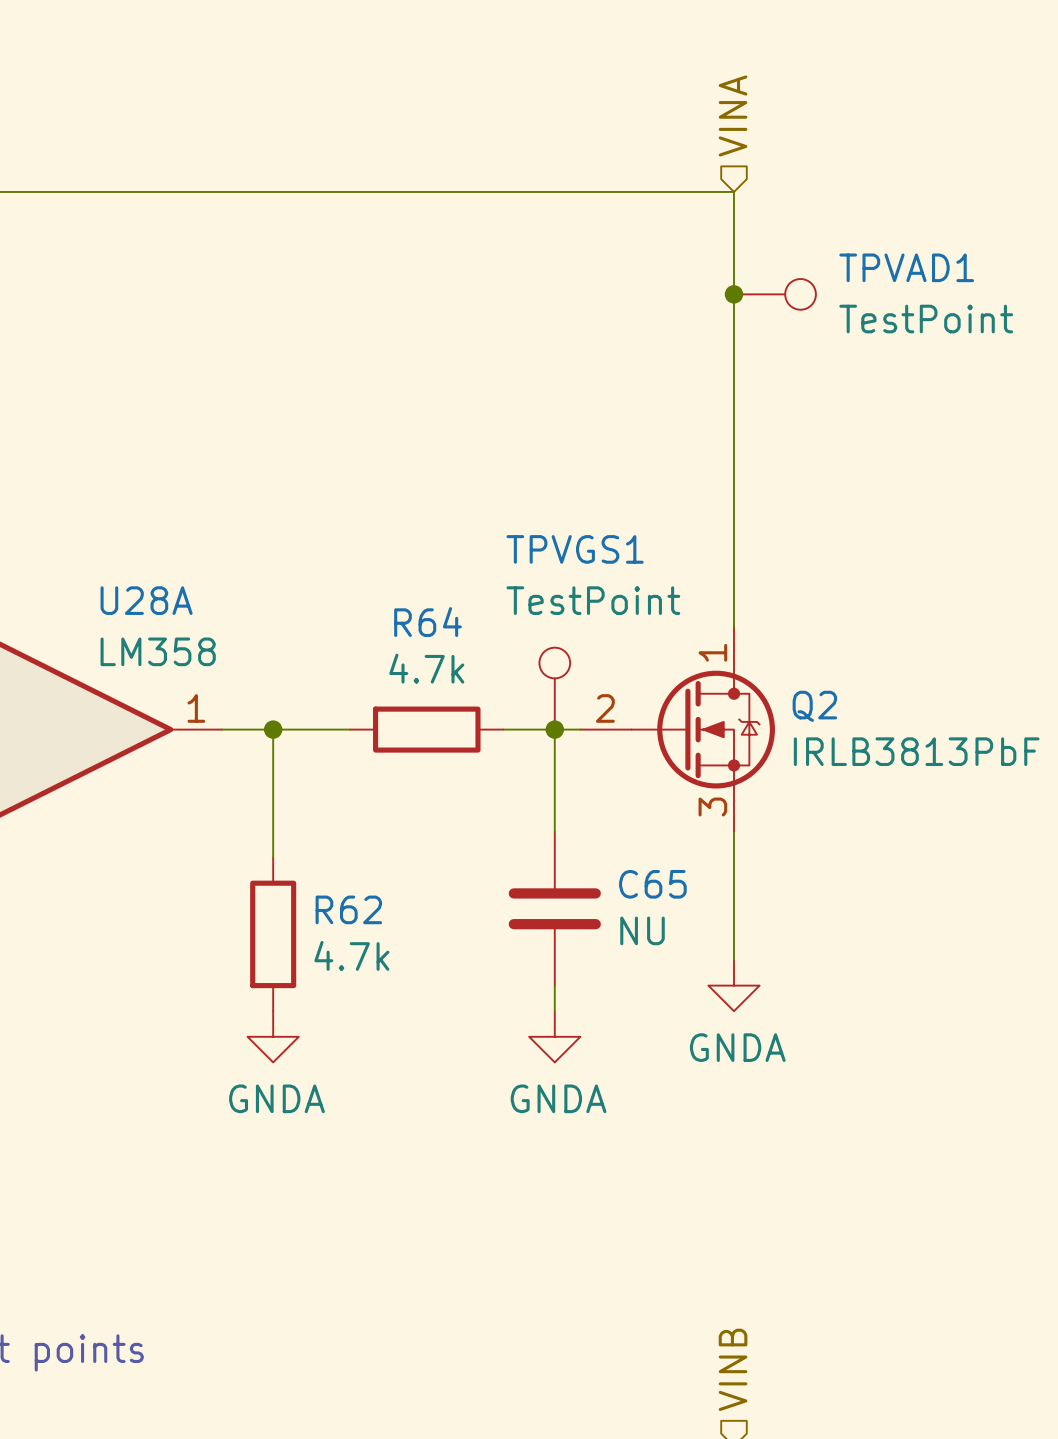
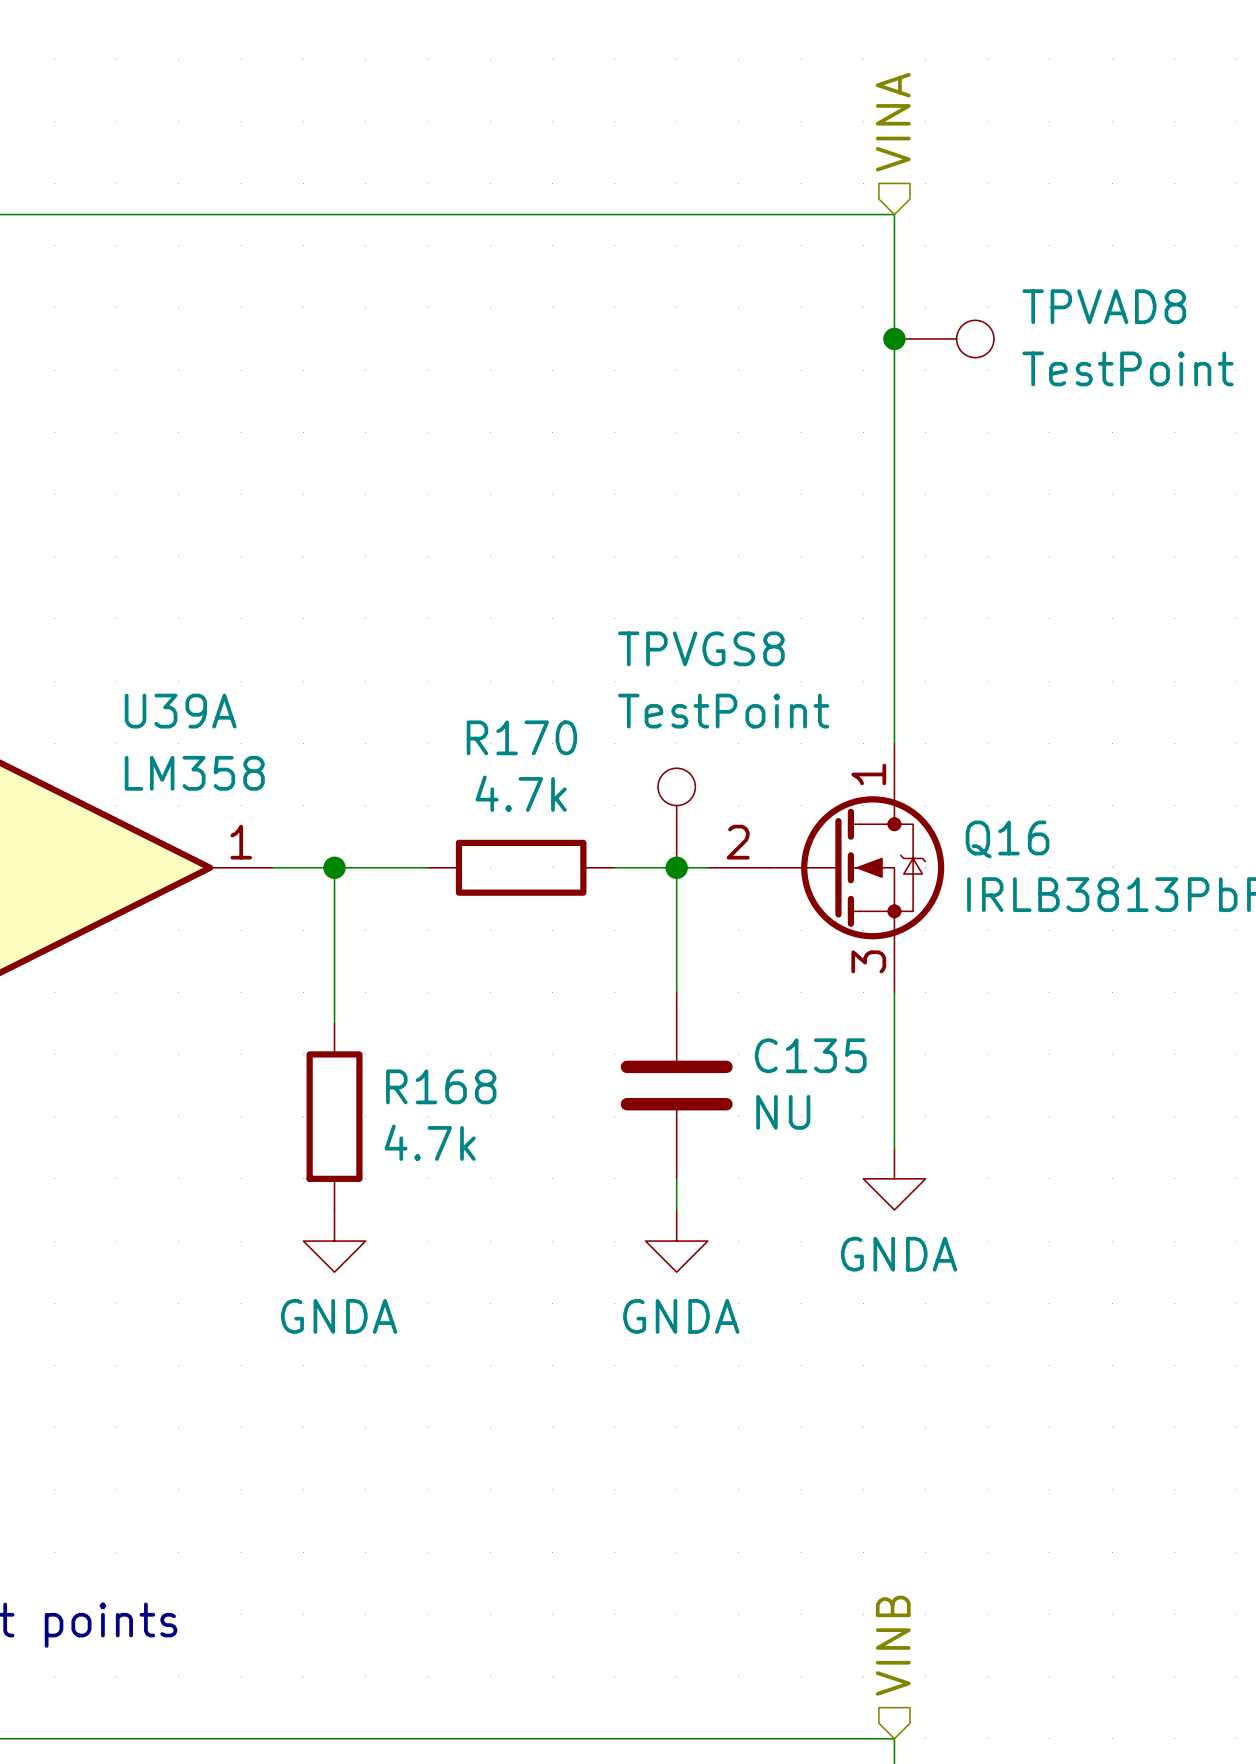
TPVAD1 name: TPVAD1 (906, 267) -> TPVAD8 (1104, 306)
TPVGS1 name: TPVGS1 (575, 549) -> TPVGS8 (701, 648)
U28A name: U28A (146, 600) -> U39A (180, 711)
R64 name: R64 (428, 622) -> R170 (521, 737)
Q2 name: Q2 (814, 706) -> Q16 (1007, 839)
C65 name: C65 (652, 884) -> C135 (810, 1055)
R62 name: R62 (348, 909) -> R168 (441, 1086)

